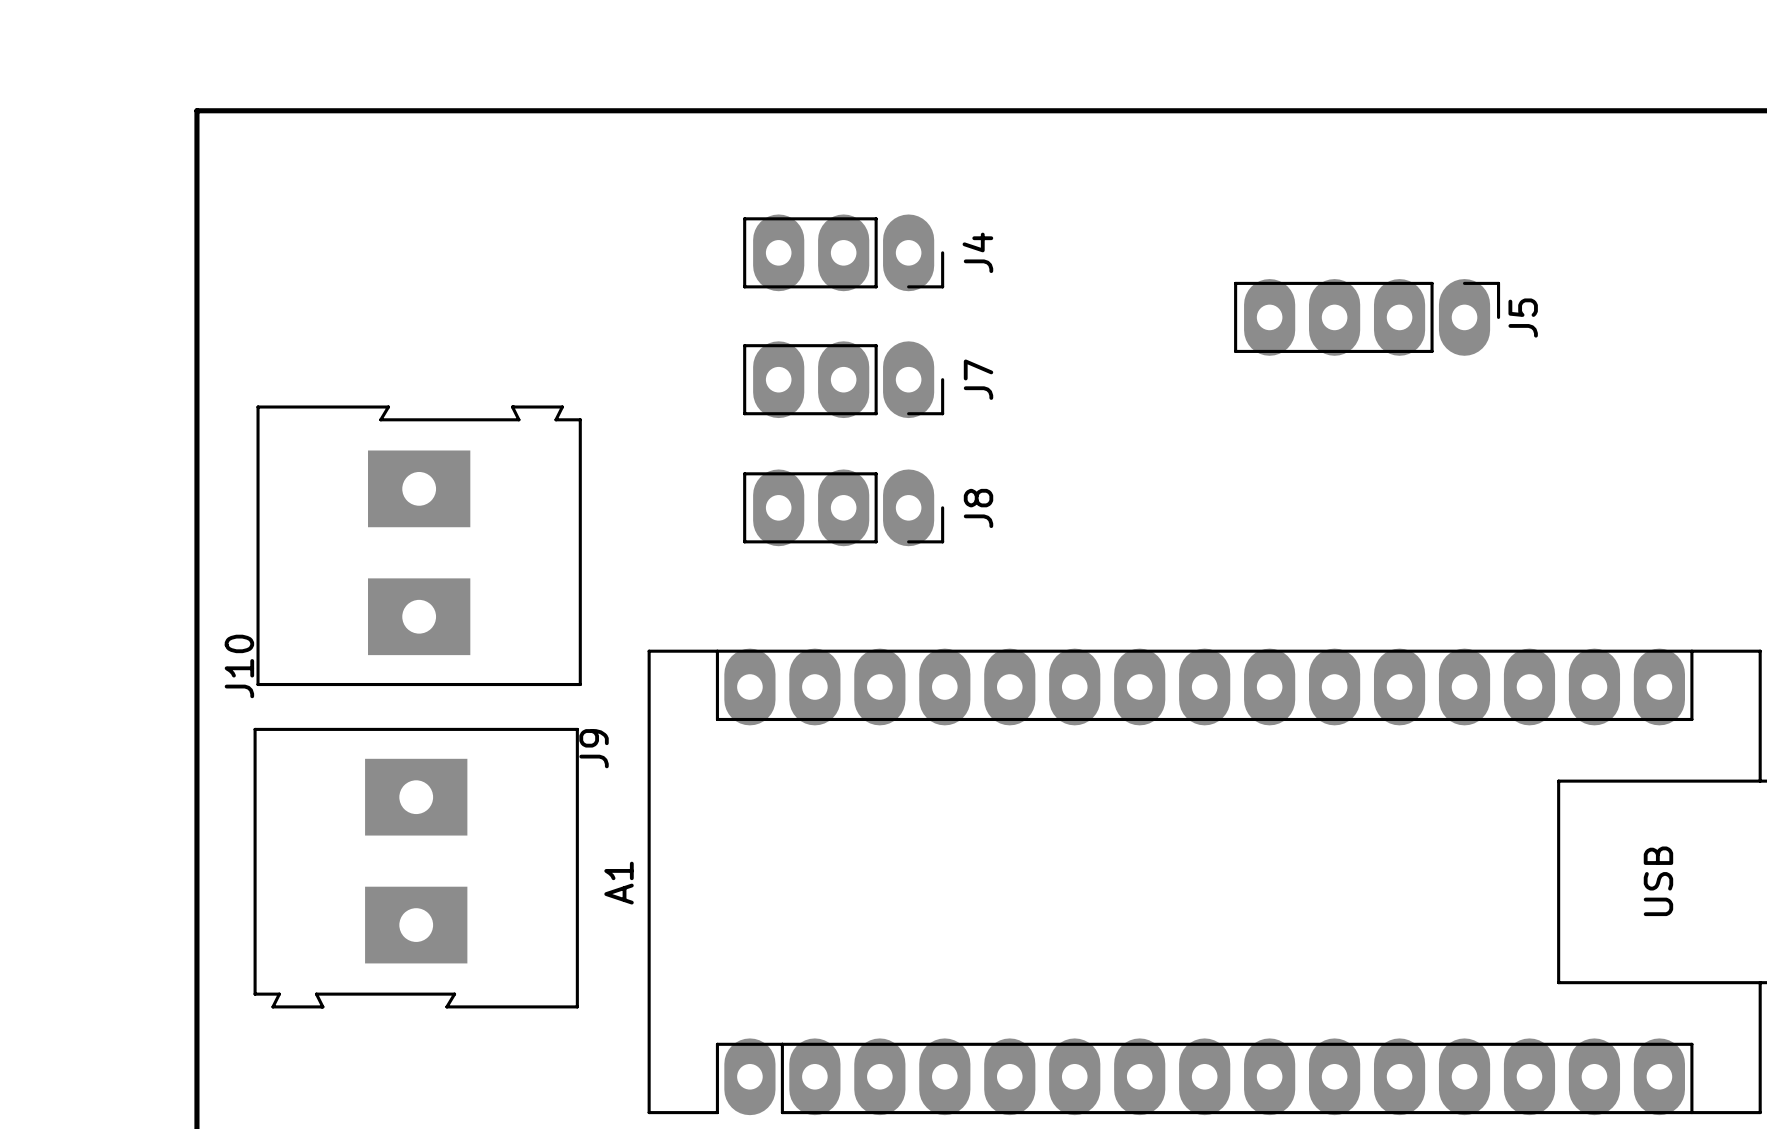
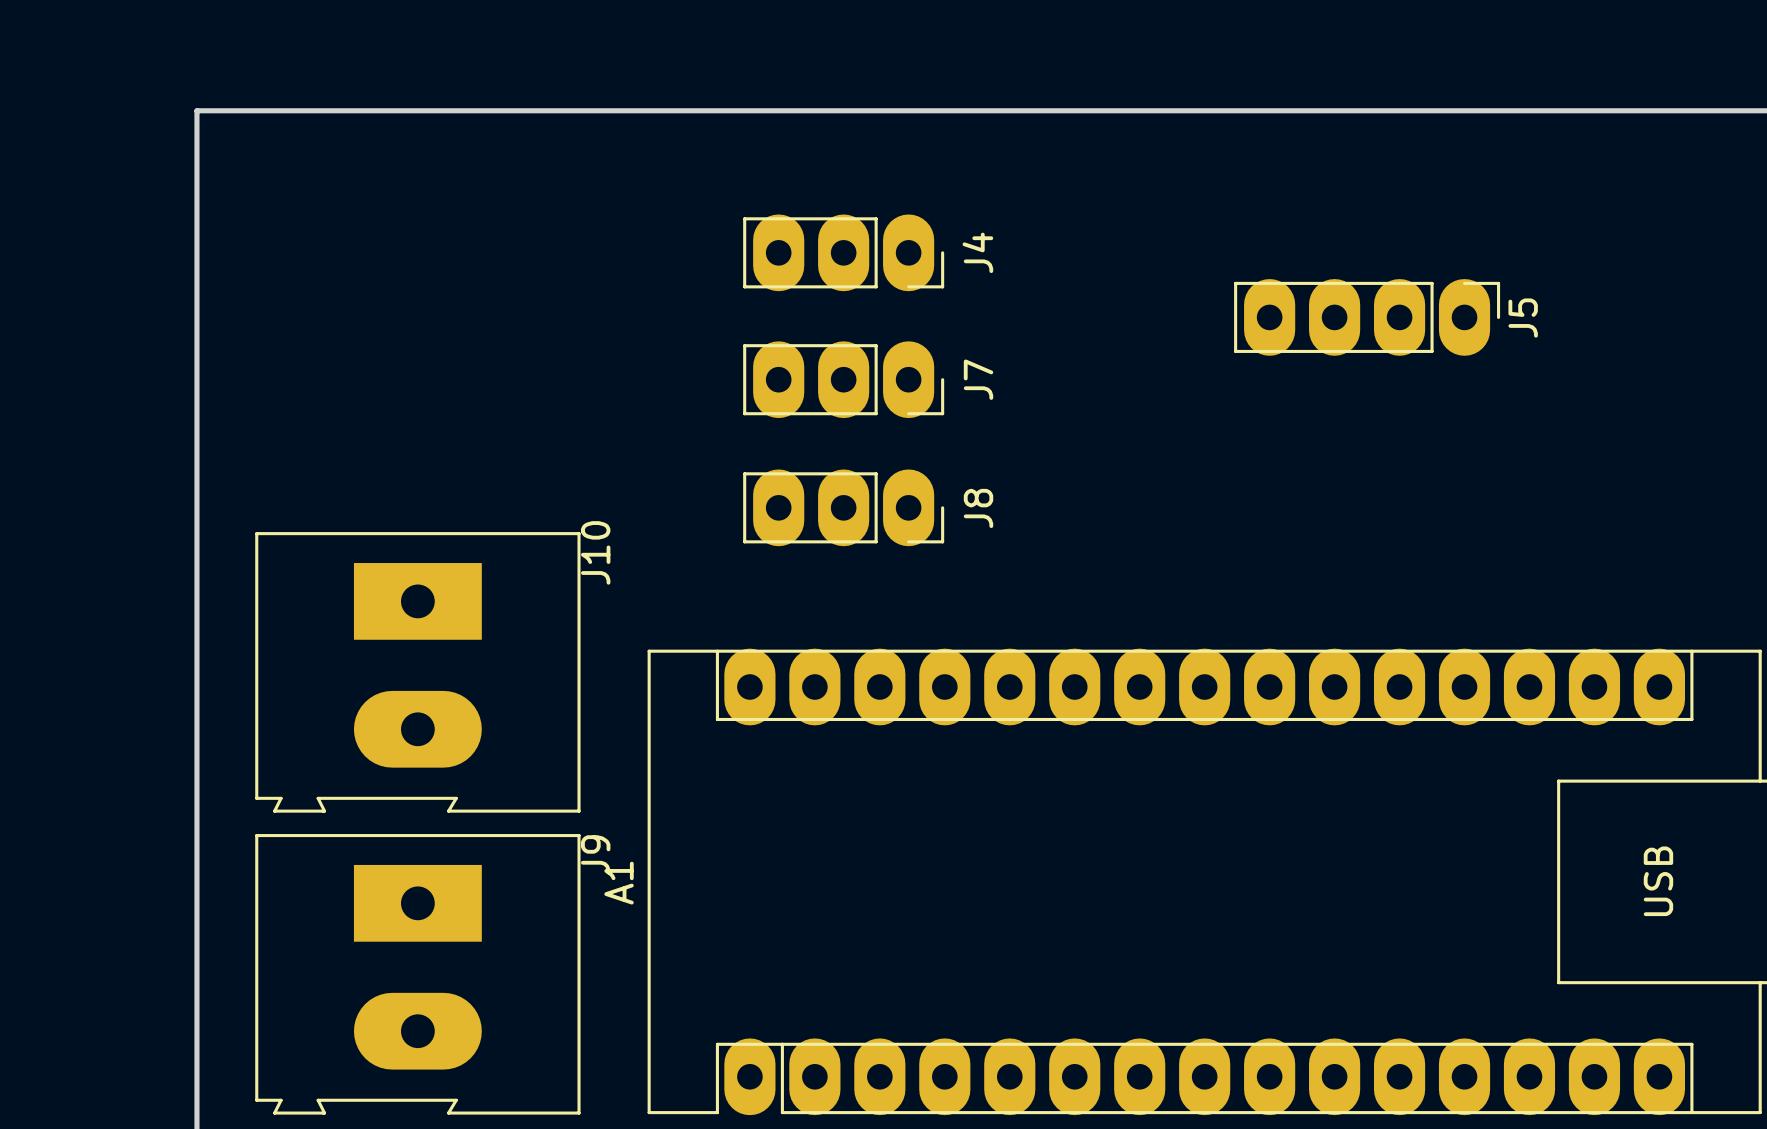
J10 footprint: [256, 405, 582, 687] -> [255, 532, 581, 813]
J10 name position: J10 (239, 666) -> J10 (595, 552)
J9 footprint: [253, 727, 579, 1009] -> [255, 834, 581, 1115]

